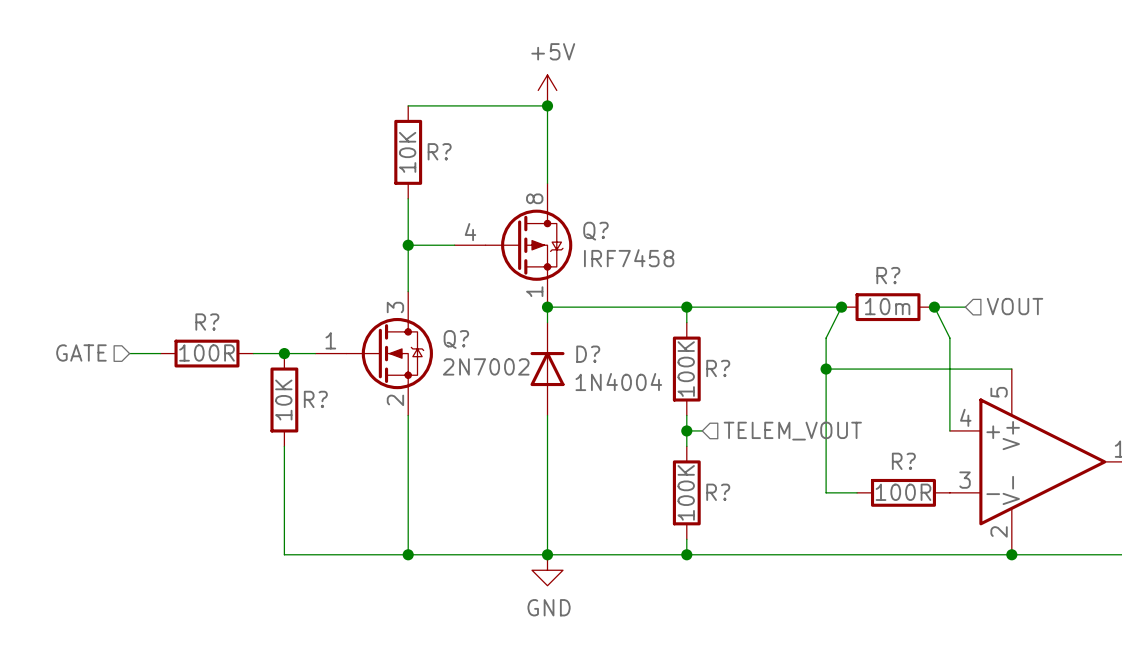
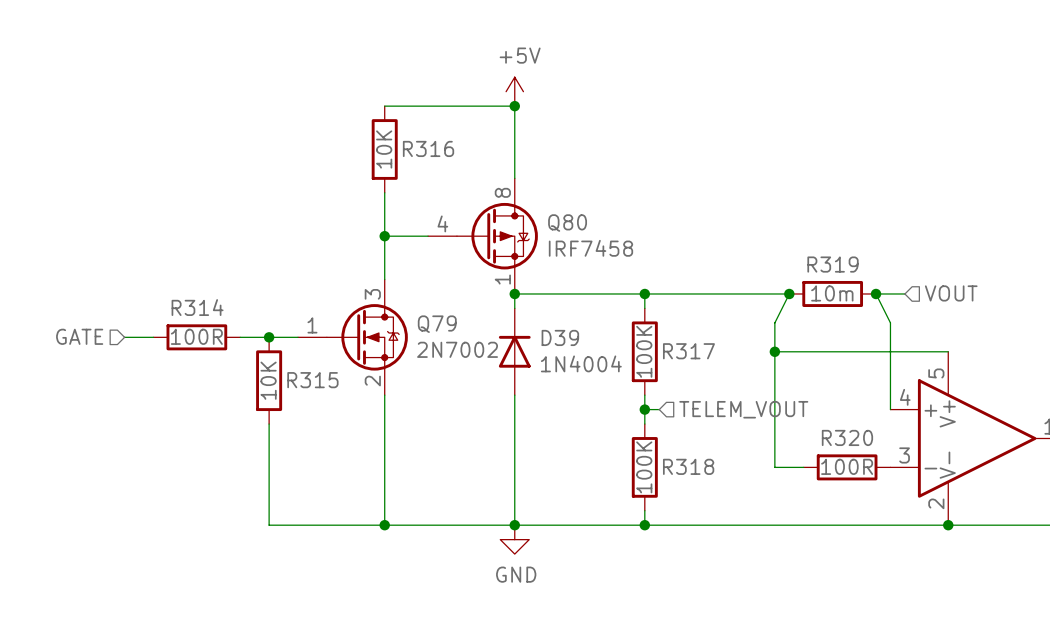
R? name: R? (439, 151) -> R316 (428, 148)
Q? name: Q? (595, 231) -> Q80 (567, 223)
R? name: R? (888, 275) -> R319 (833, 264)
R? name: R? (207, 322) -> R314 (197, 307)
Q? name: Q? (456, 339) -> Q79 (437, 324)
D? name: D? (588, 354) -> D39 (560, 337)
R? name: R? (718, 368) -> R317 (688, 351)
R? name: R? (315, 399) -> R315 (312, 380)
R? name: R? (903, 461) -> R320 (847, 437)
R? name: R? (718, 492) -> R318 (688, 466)

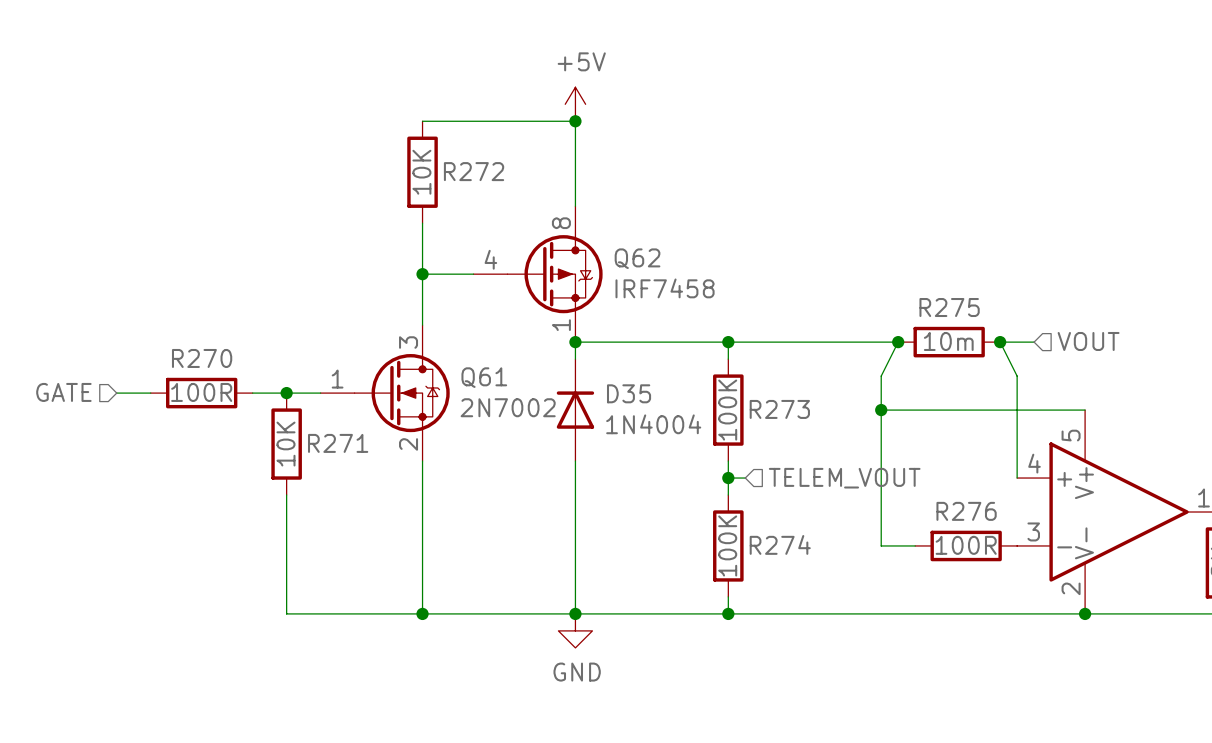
R316 name: R316 (428, 148) -> R272 (474, 171)
Q80 name: Q80 (567, 223) -> Q62 (637, 258)
R319 name: R319 (833, 264) -> R275 (949, 307)
R314 name: R314 (197, 307) -> R270 (202, 358)
Q79 name: Q79 (437, 324) -> Q61 (484, 377)
D39 name: D39 (560, 337) -> D35 (629, 393)
R317 name: R317 (688, 351) -> R273 (779, 409)
R315 name: R315 (312, 380) -> R271 (338, 443)
R320 name: R320 (847, 437) -> R276 (966, 511)
R318 name: R318 (688, 466) -> R274 (780, 544)

